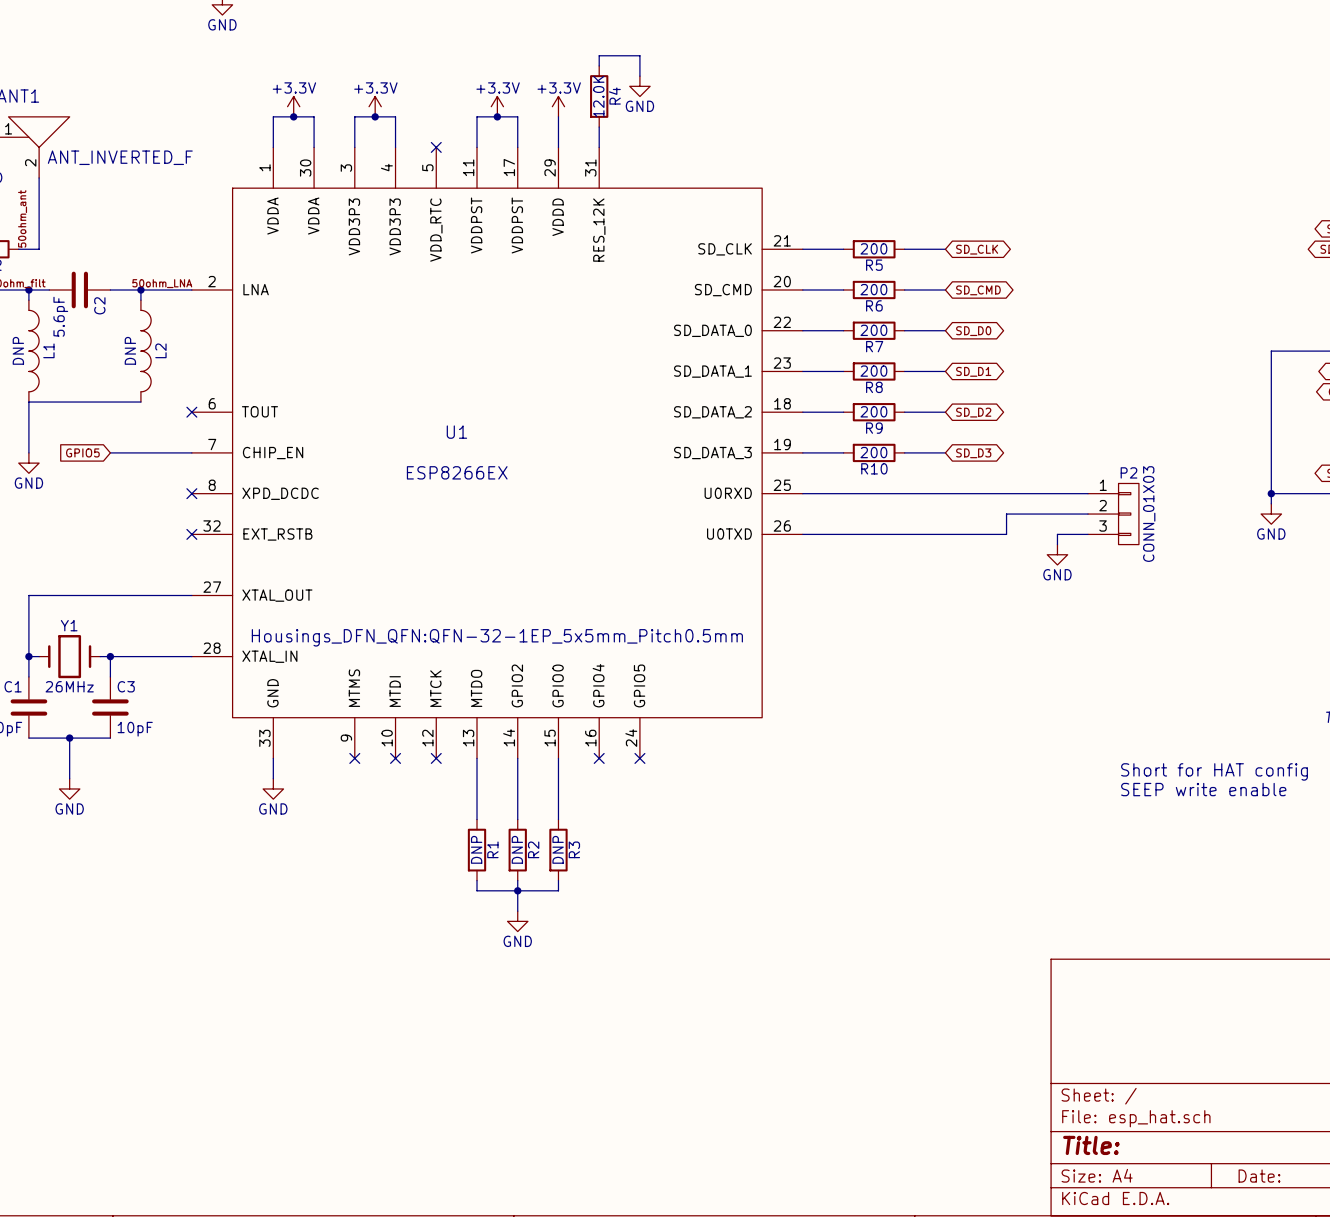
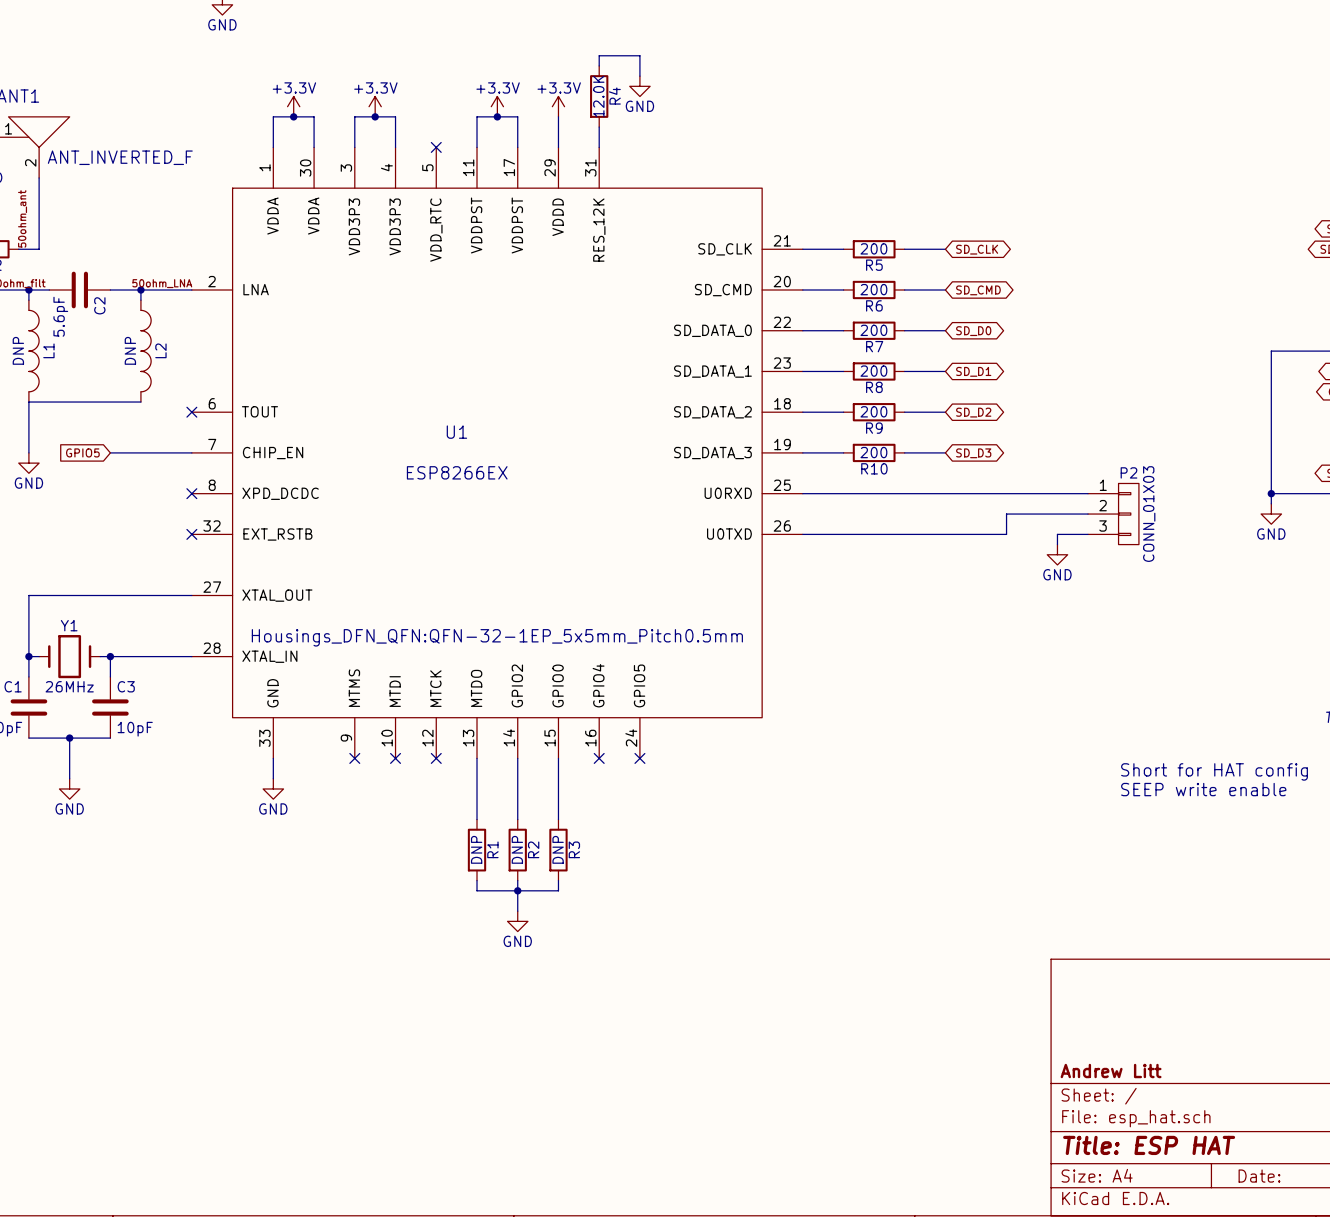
title block: none -> Andrew Litt (1111, 1071)
title block: Title: (1091, 1145) -> Title: ESP HAT (1149, 1145)

